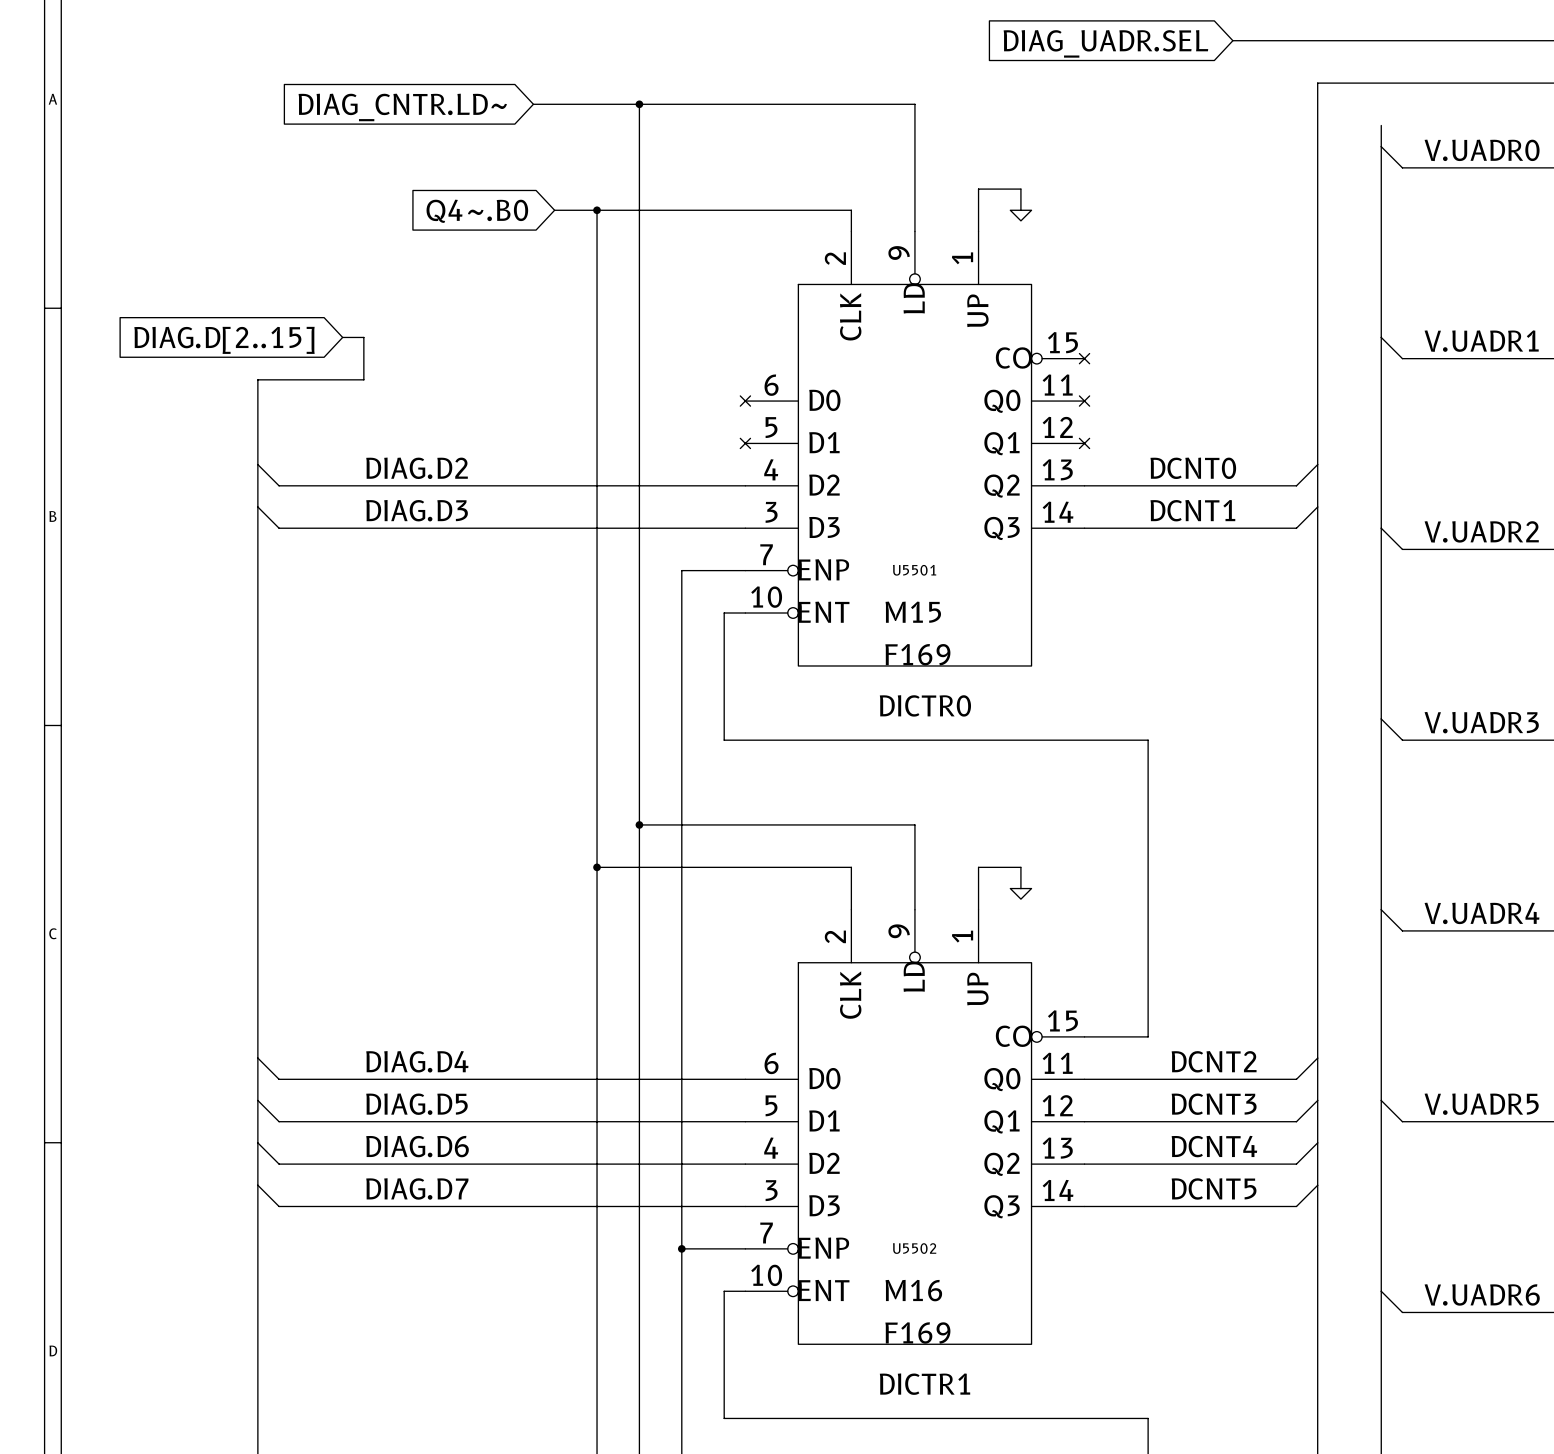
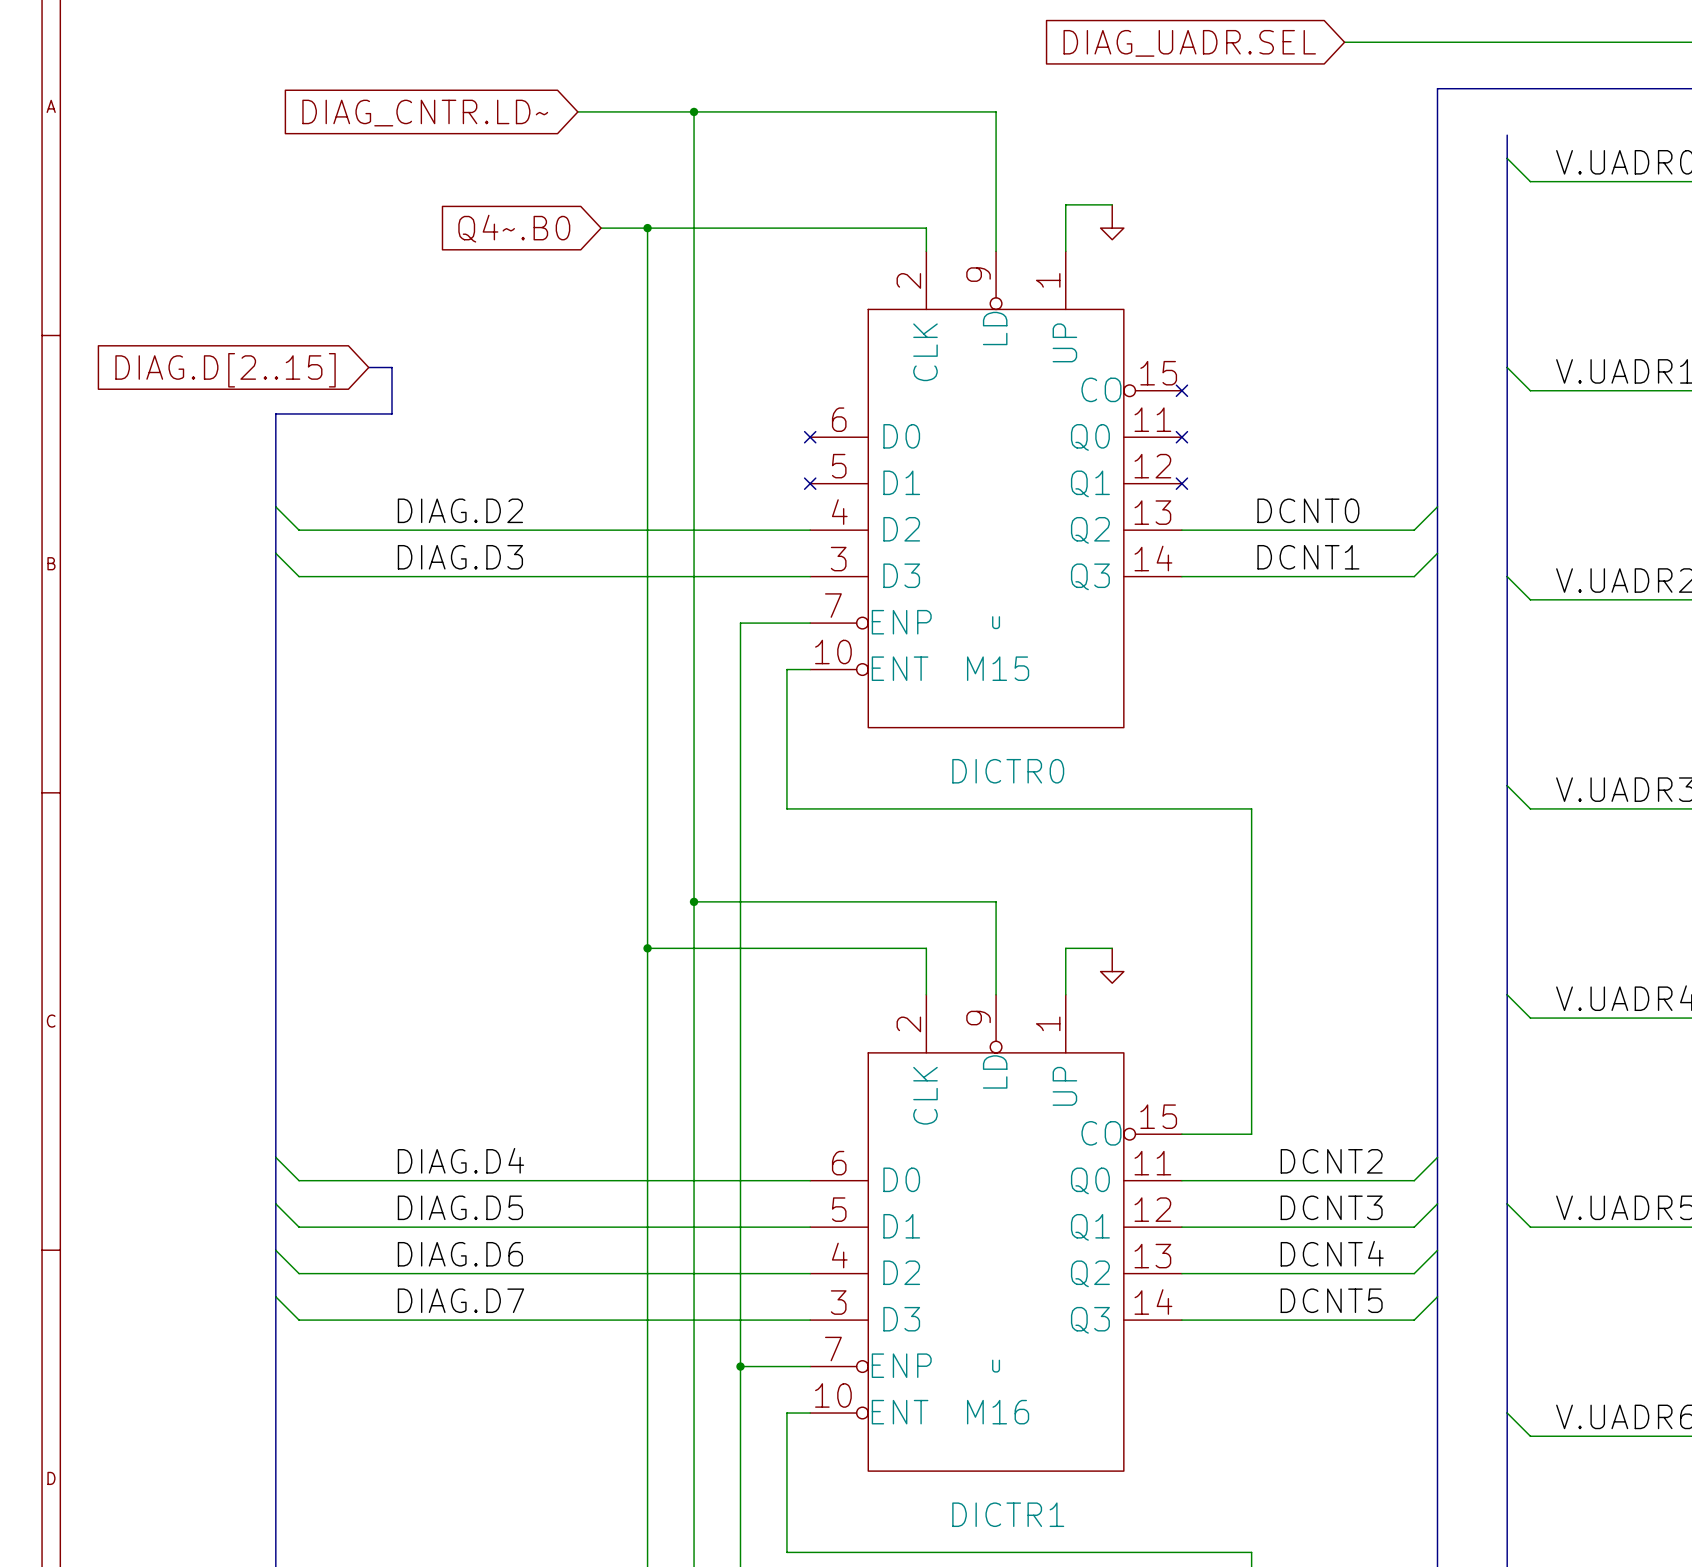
U5501 name: U5501 (914, 570) -> U (996, 622)
U5501 value: F169 (917, 654) -> none
U5502 name: U5502 (914, 1248) -> U (996, 1366)
U5502 value: F169 (917, 1332) -> none

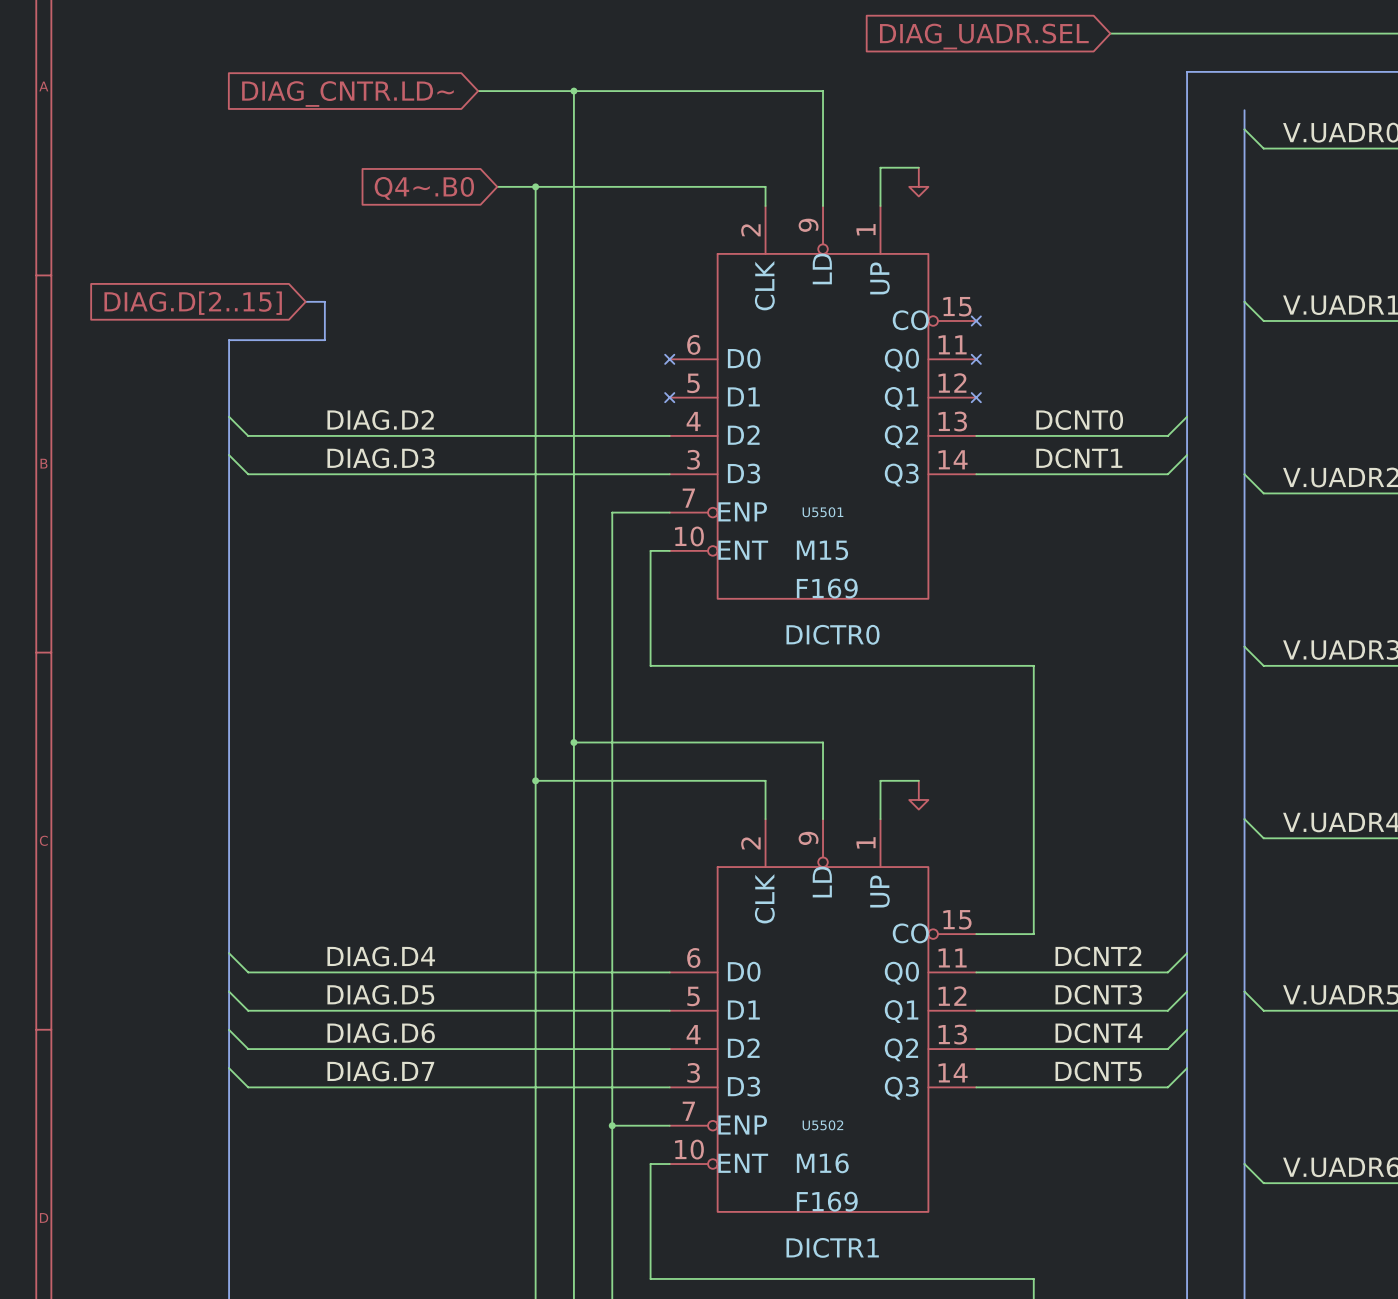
U name: U (996, 622) -> U5501 (822, 512)
U value: none -> F169 (827, 588)
U name: U (996, 1366) -> U5502 (822, 1125)
U value: none -> F169 (827, 1201)

